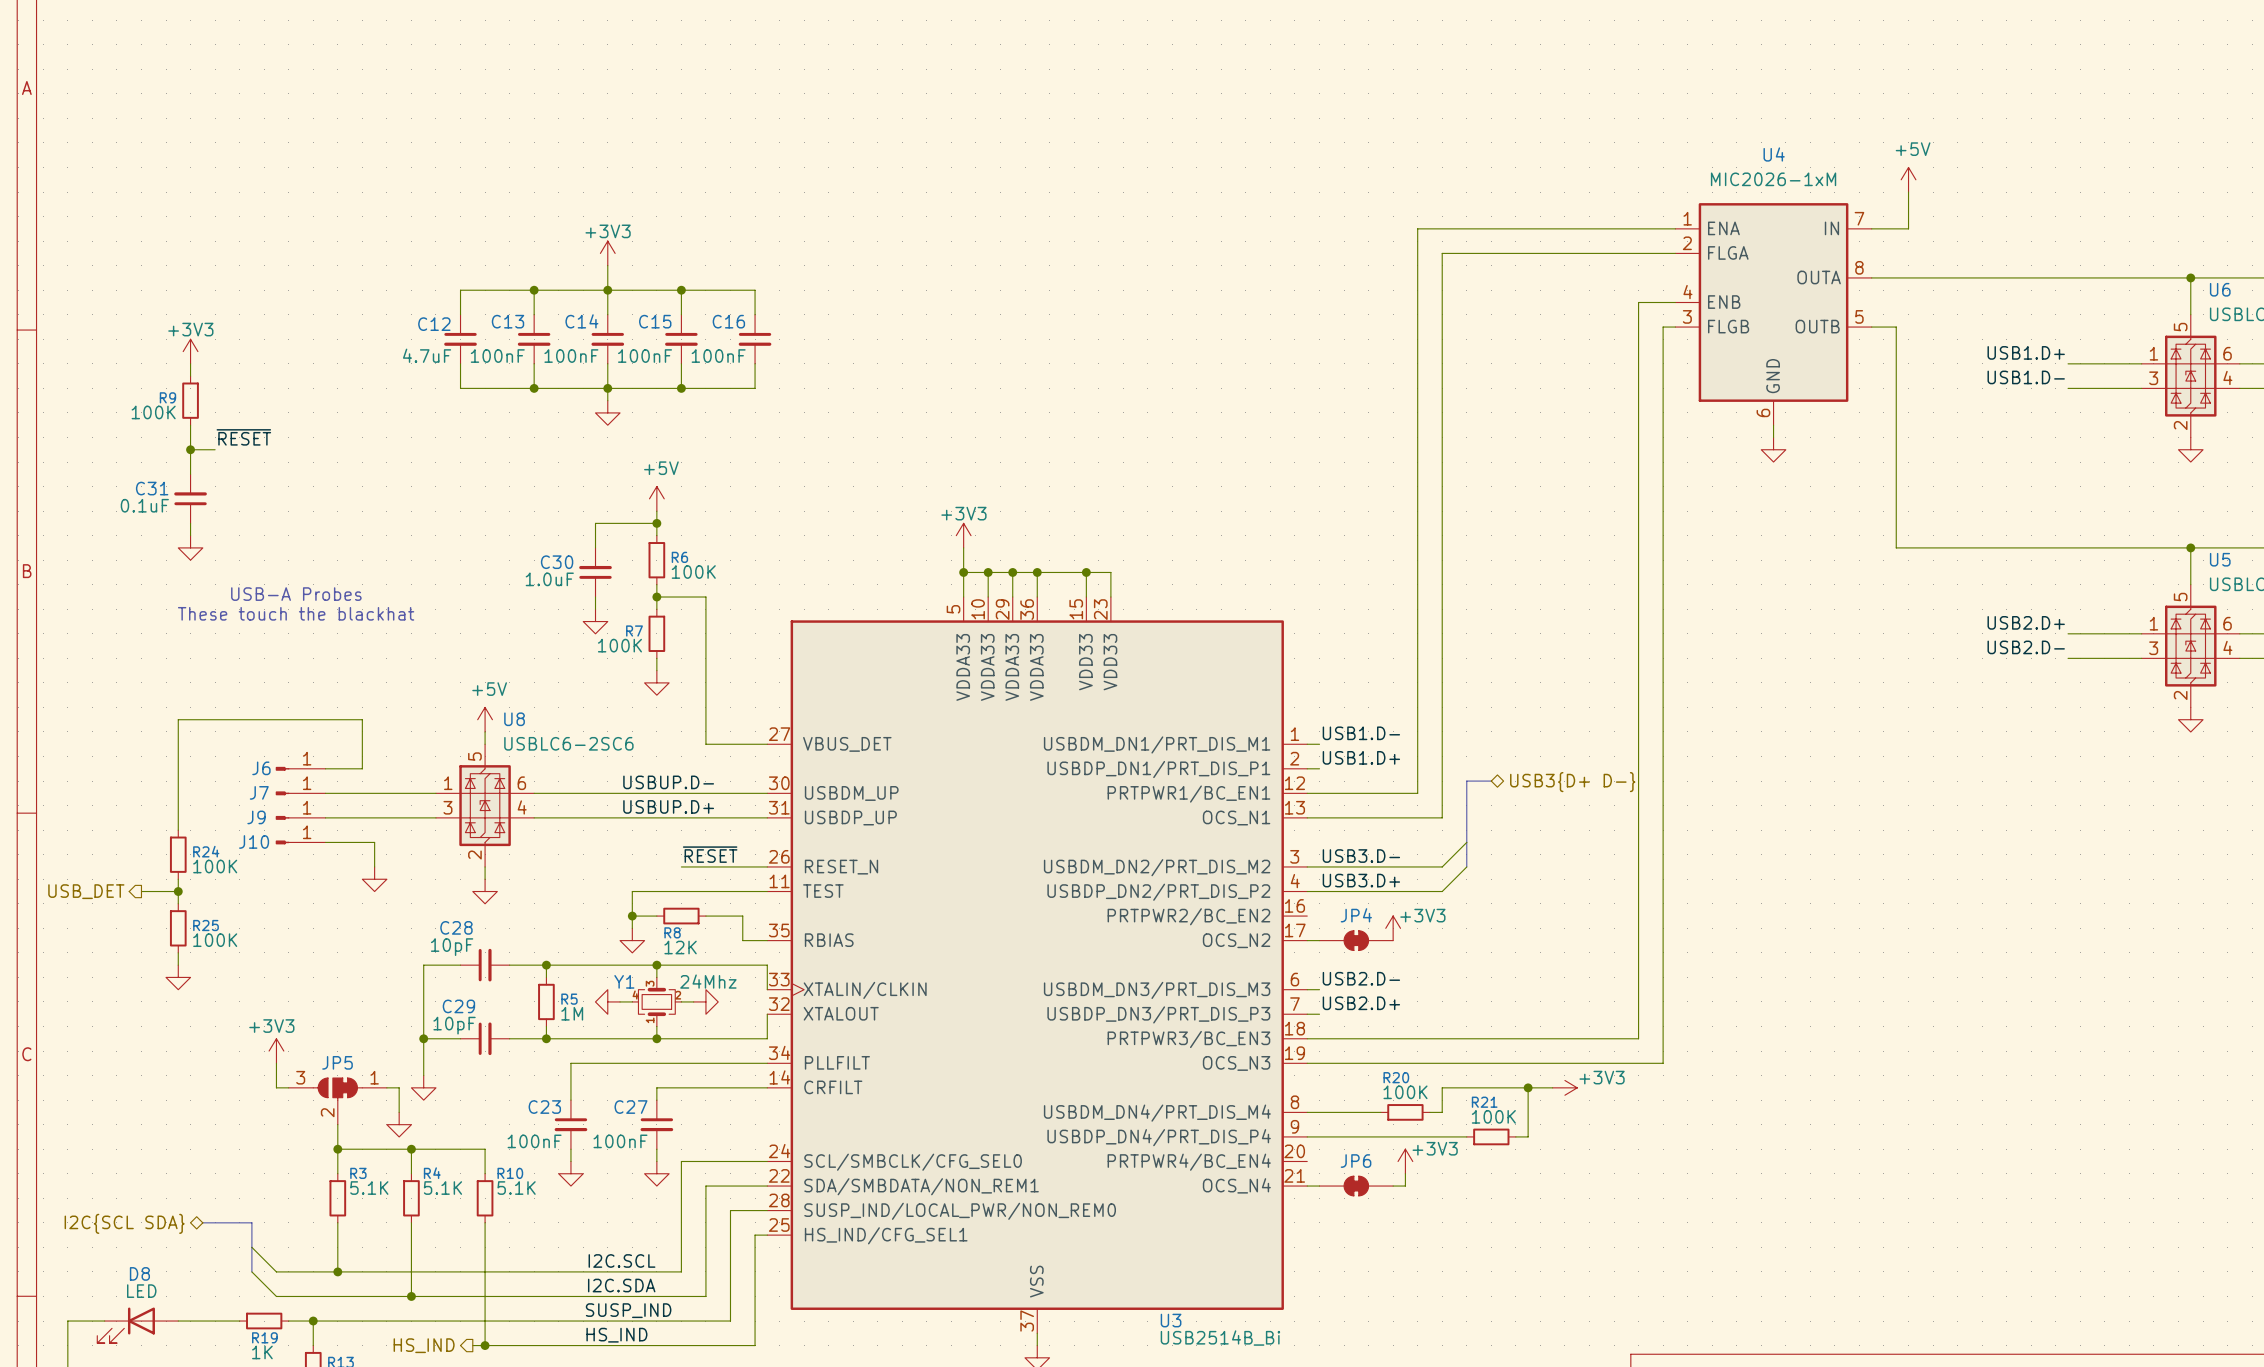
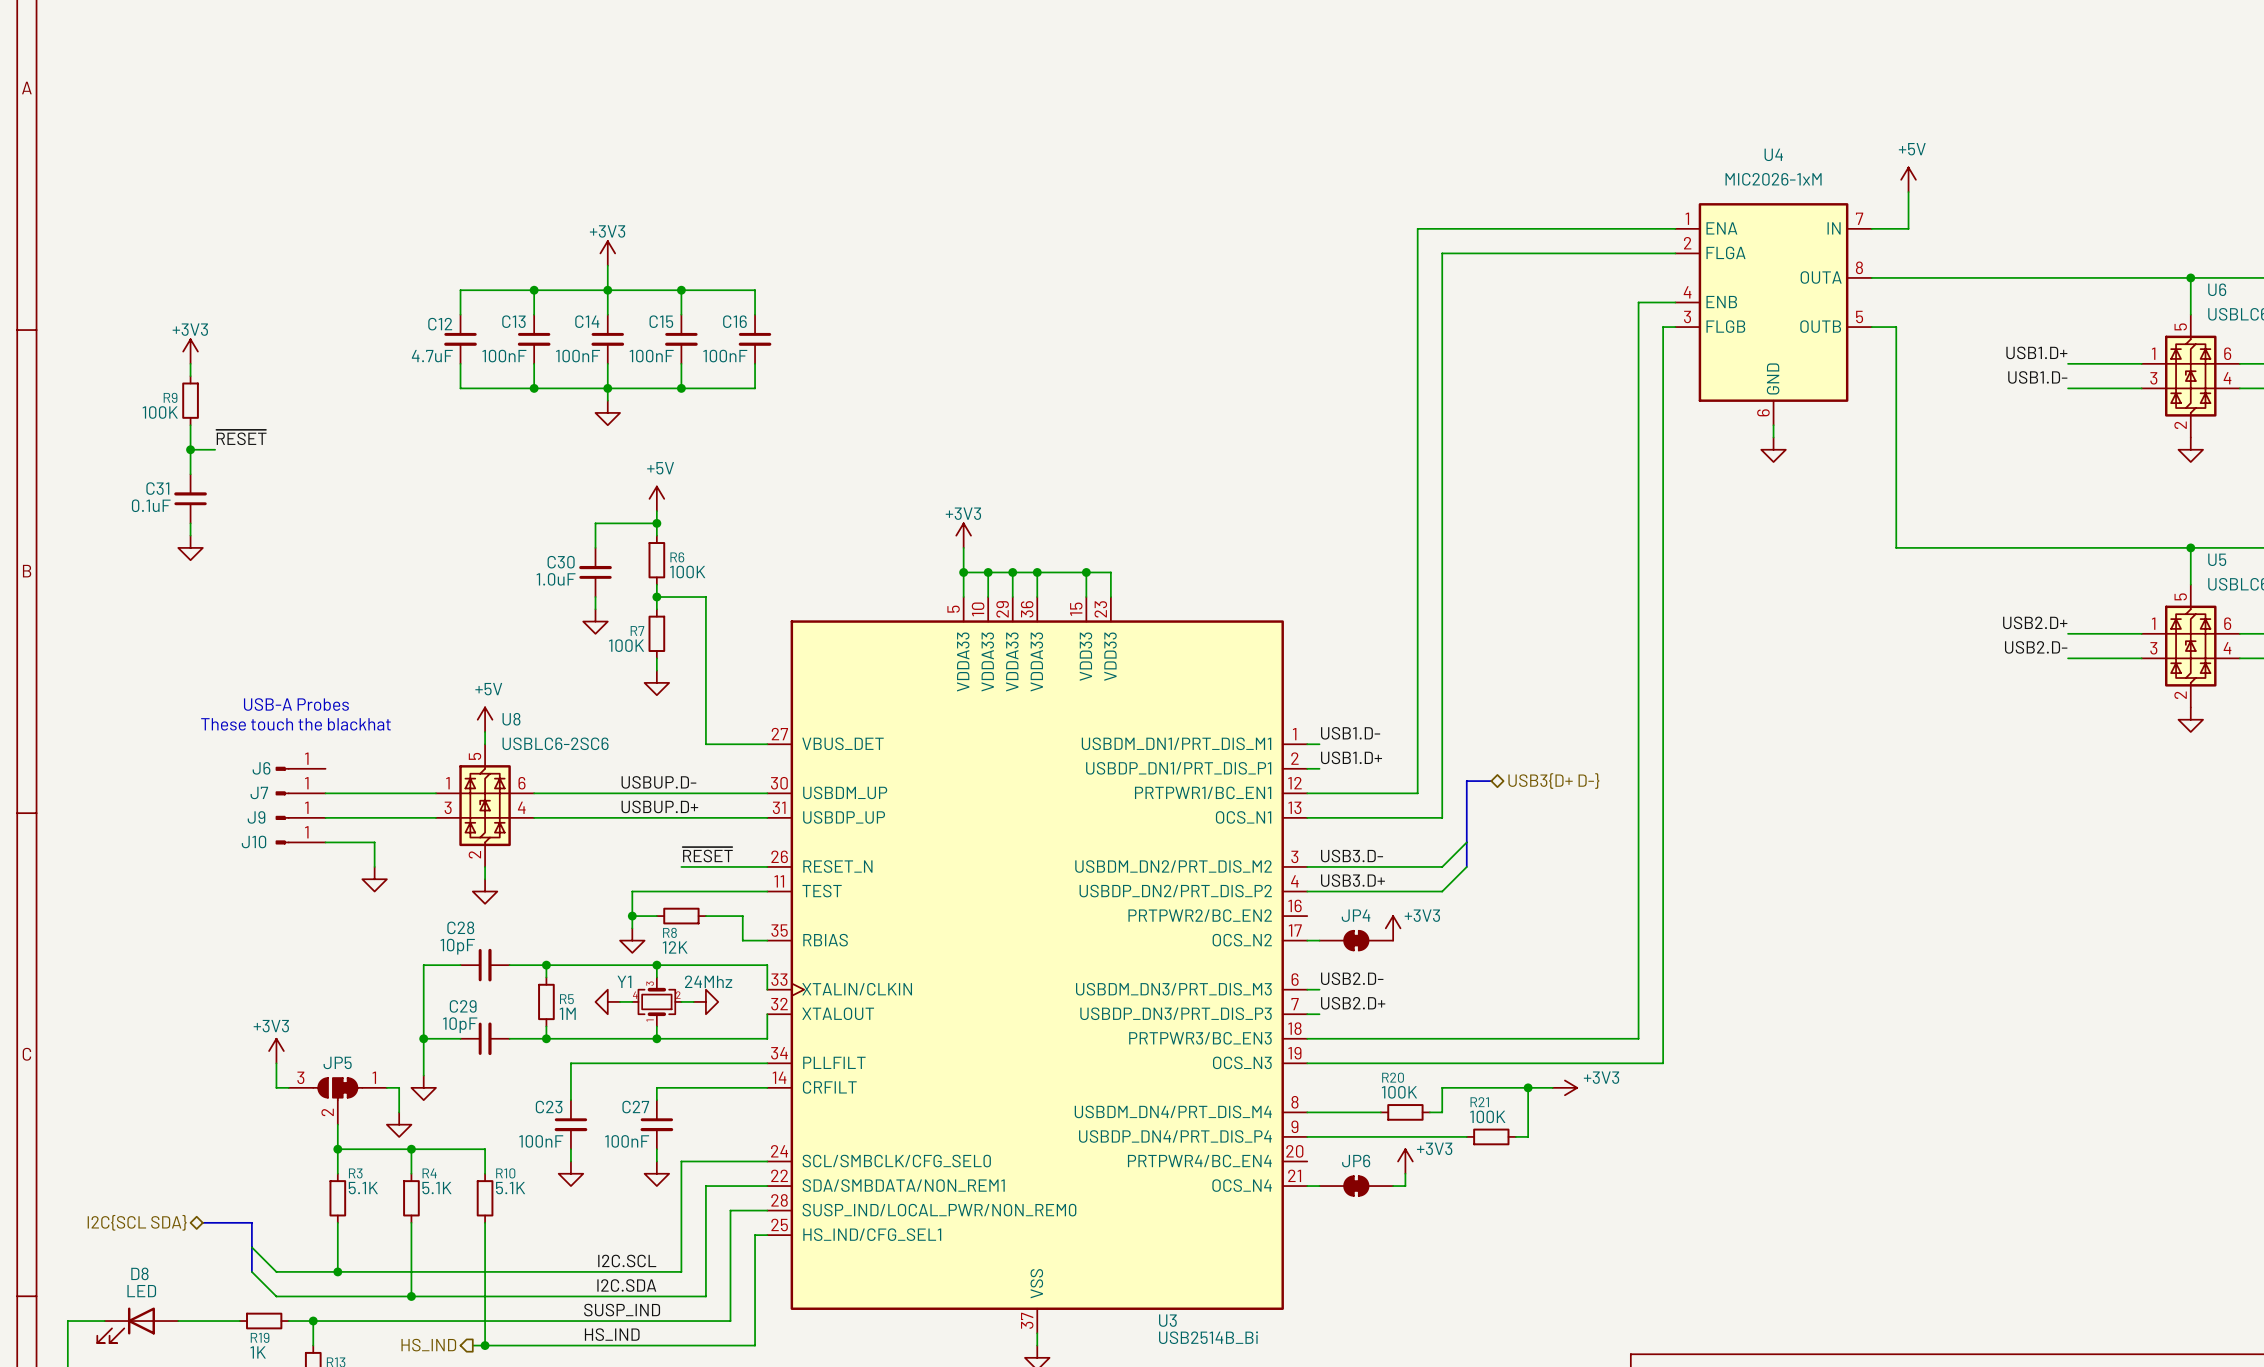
text position: USB-A Probes (296, 594) -> USB-A Probes (296, 704)
text position: These touch the blackhat (296, 613) -> These touch the blackhat (295, 724)
wire: (325, 768) (362, 768) (362, 719) (178, 719) (178, 830) -> none
R24: 100K (178, 854) -> none
wire: (178, 879) (178, 903) -> none
hierarchical label: USB_DET (86, 891) -> none
wire: (141, 891) (178, 891) -> none
junction: (178, 891) -> none
R25: 100K (178, 928) -> none
wire: (178, 952) (178, 965) -> none
power symbol: (178, 977) -> none

